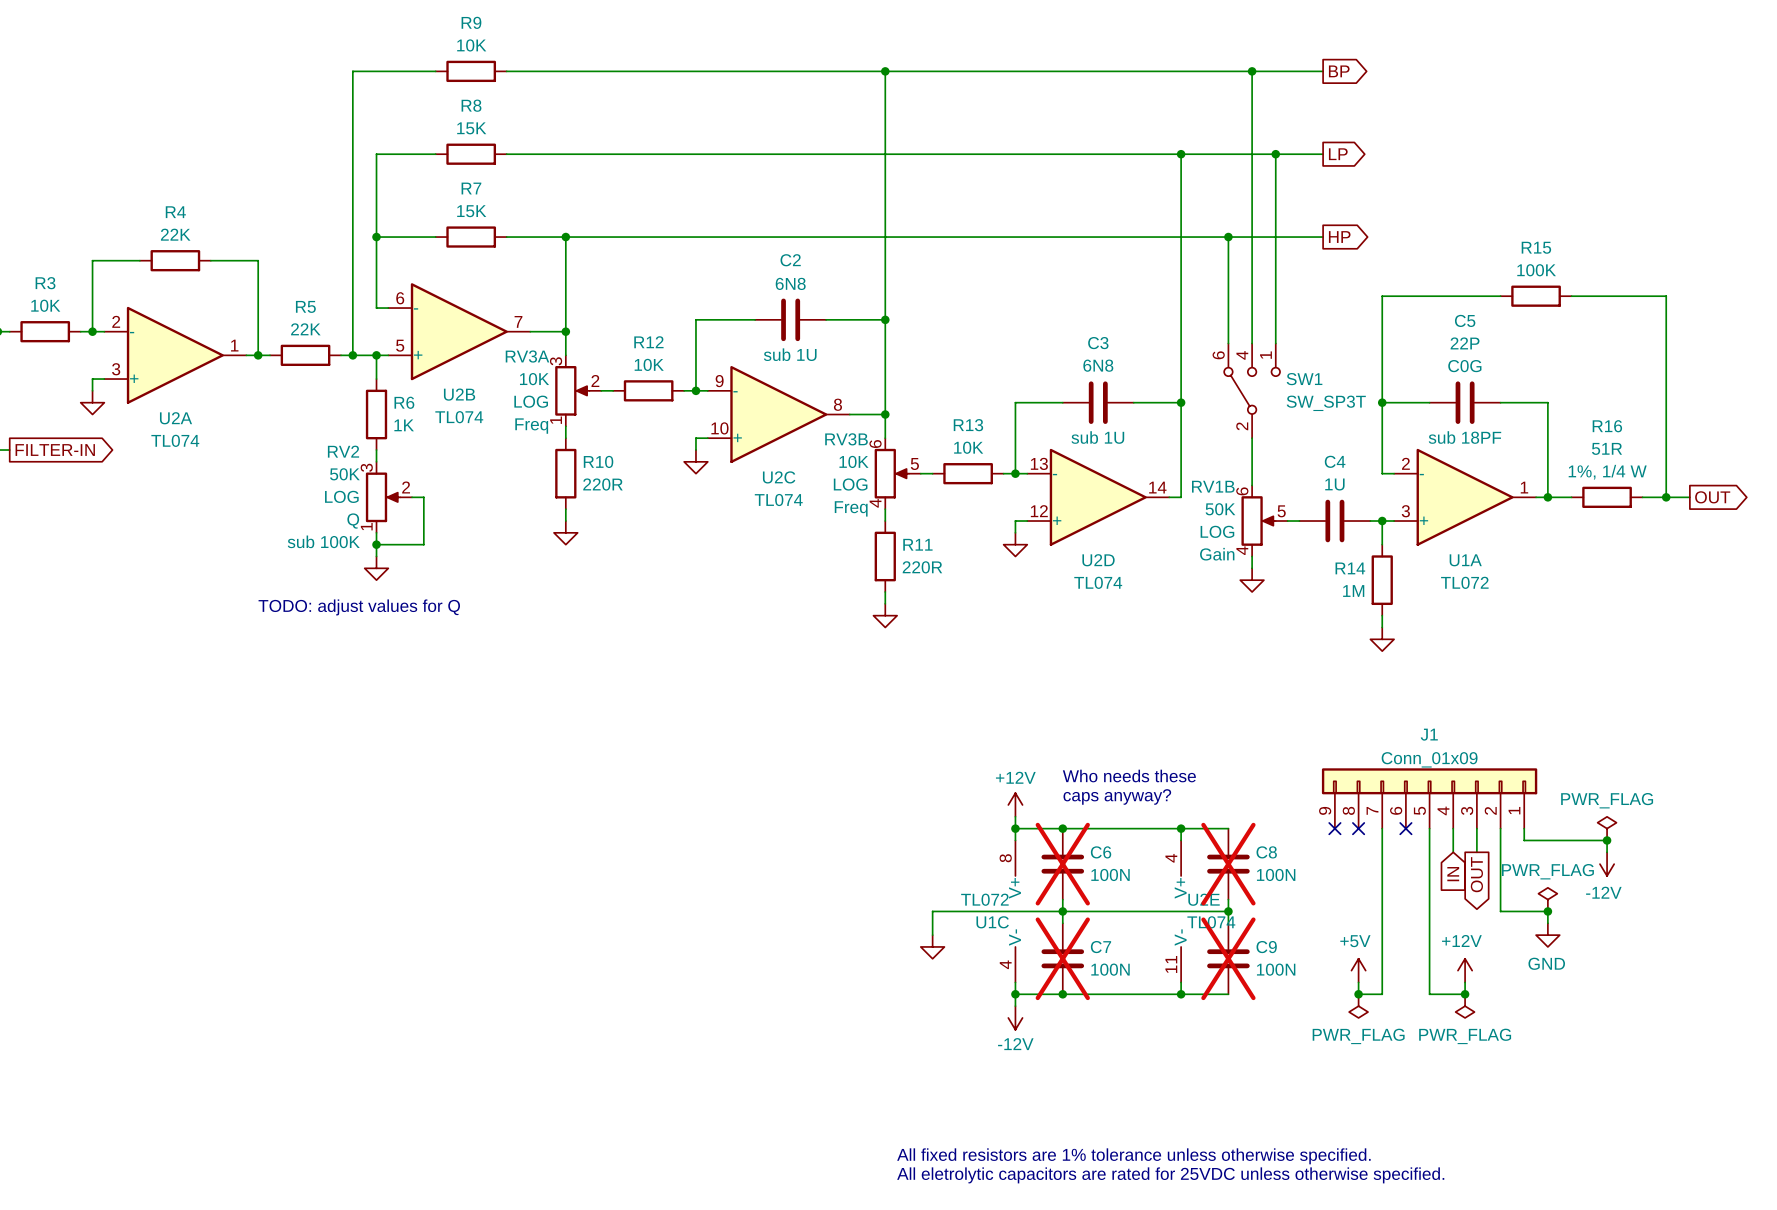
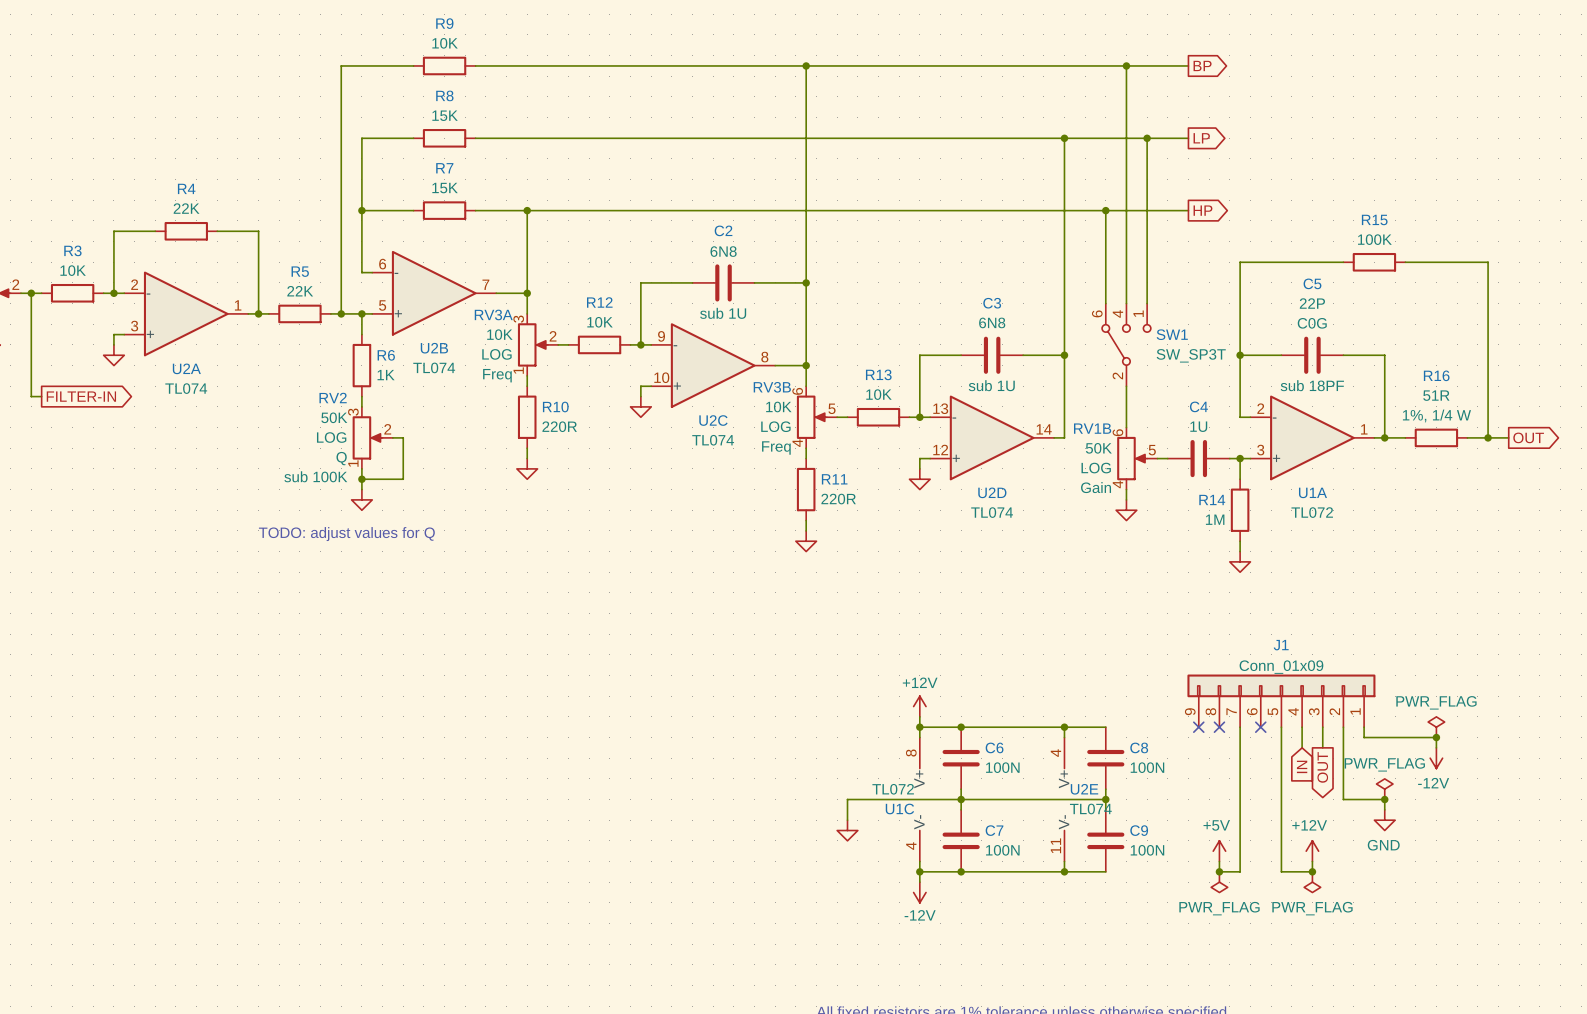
text: Who needs these (1129, 776) -> none
text: caps anyway? (1117, 796) -> none
C6 do-not-place cross: (1062, 864) -> none
C8 do-not-place cross: (1228, 864) -> none
C7 do-not-place cross: (1062, 958) -> none
C9 do-not-place cross: (1228, 958) -> none

